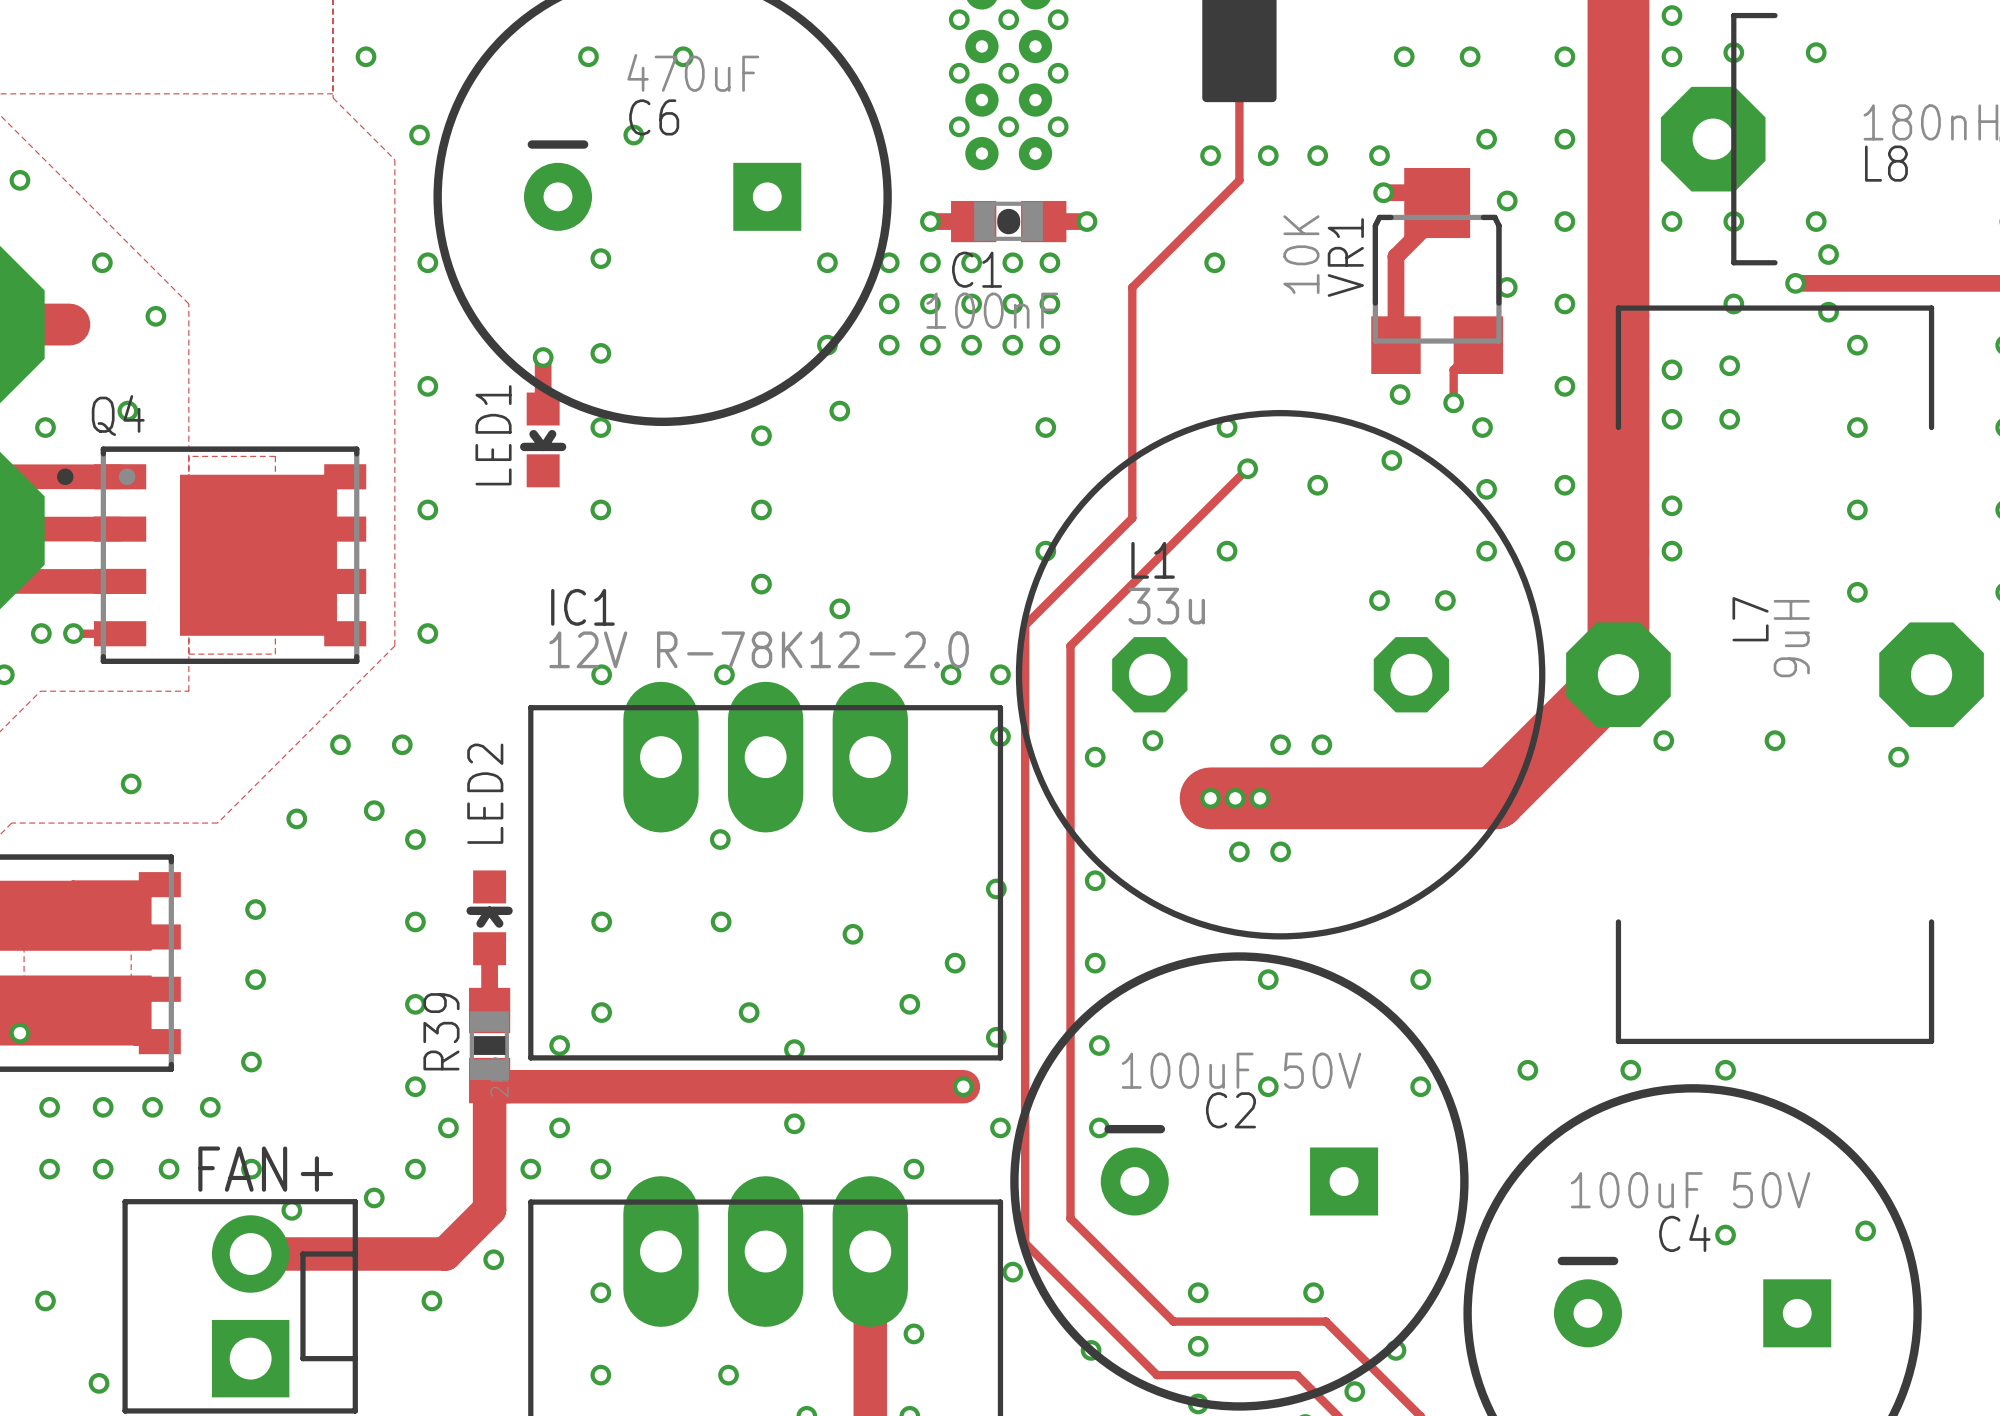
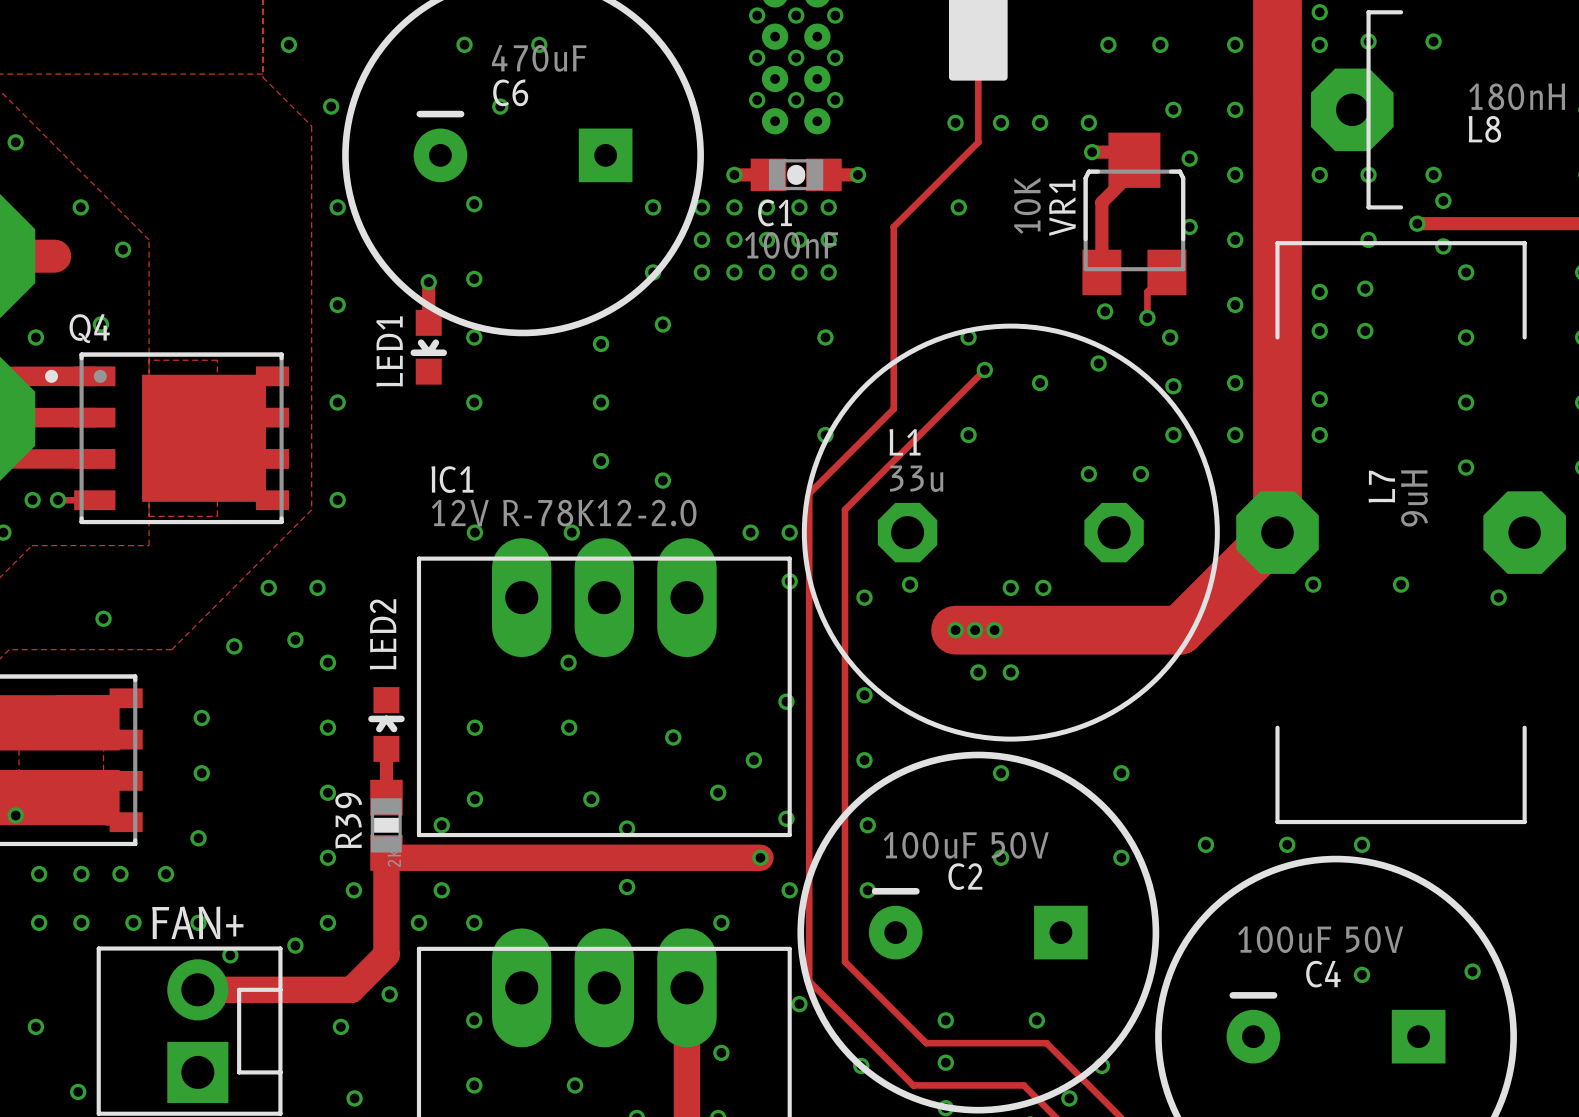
via: none -> (354, 1098)

